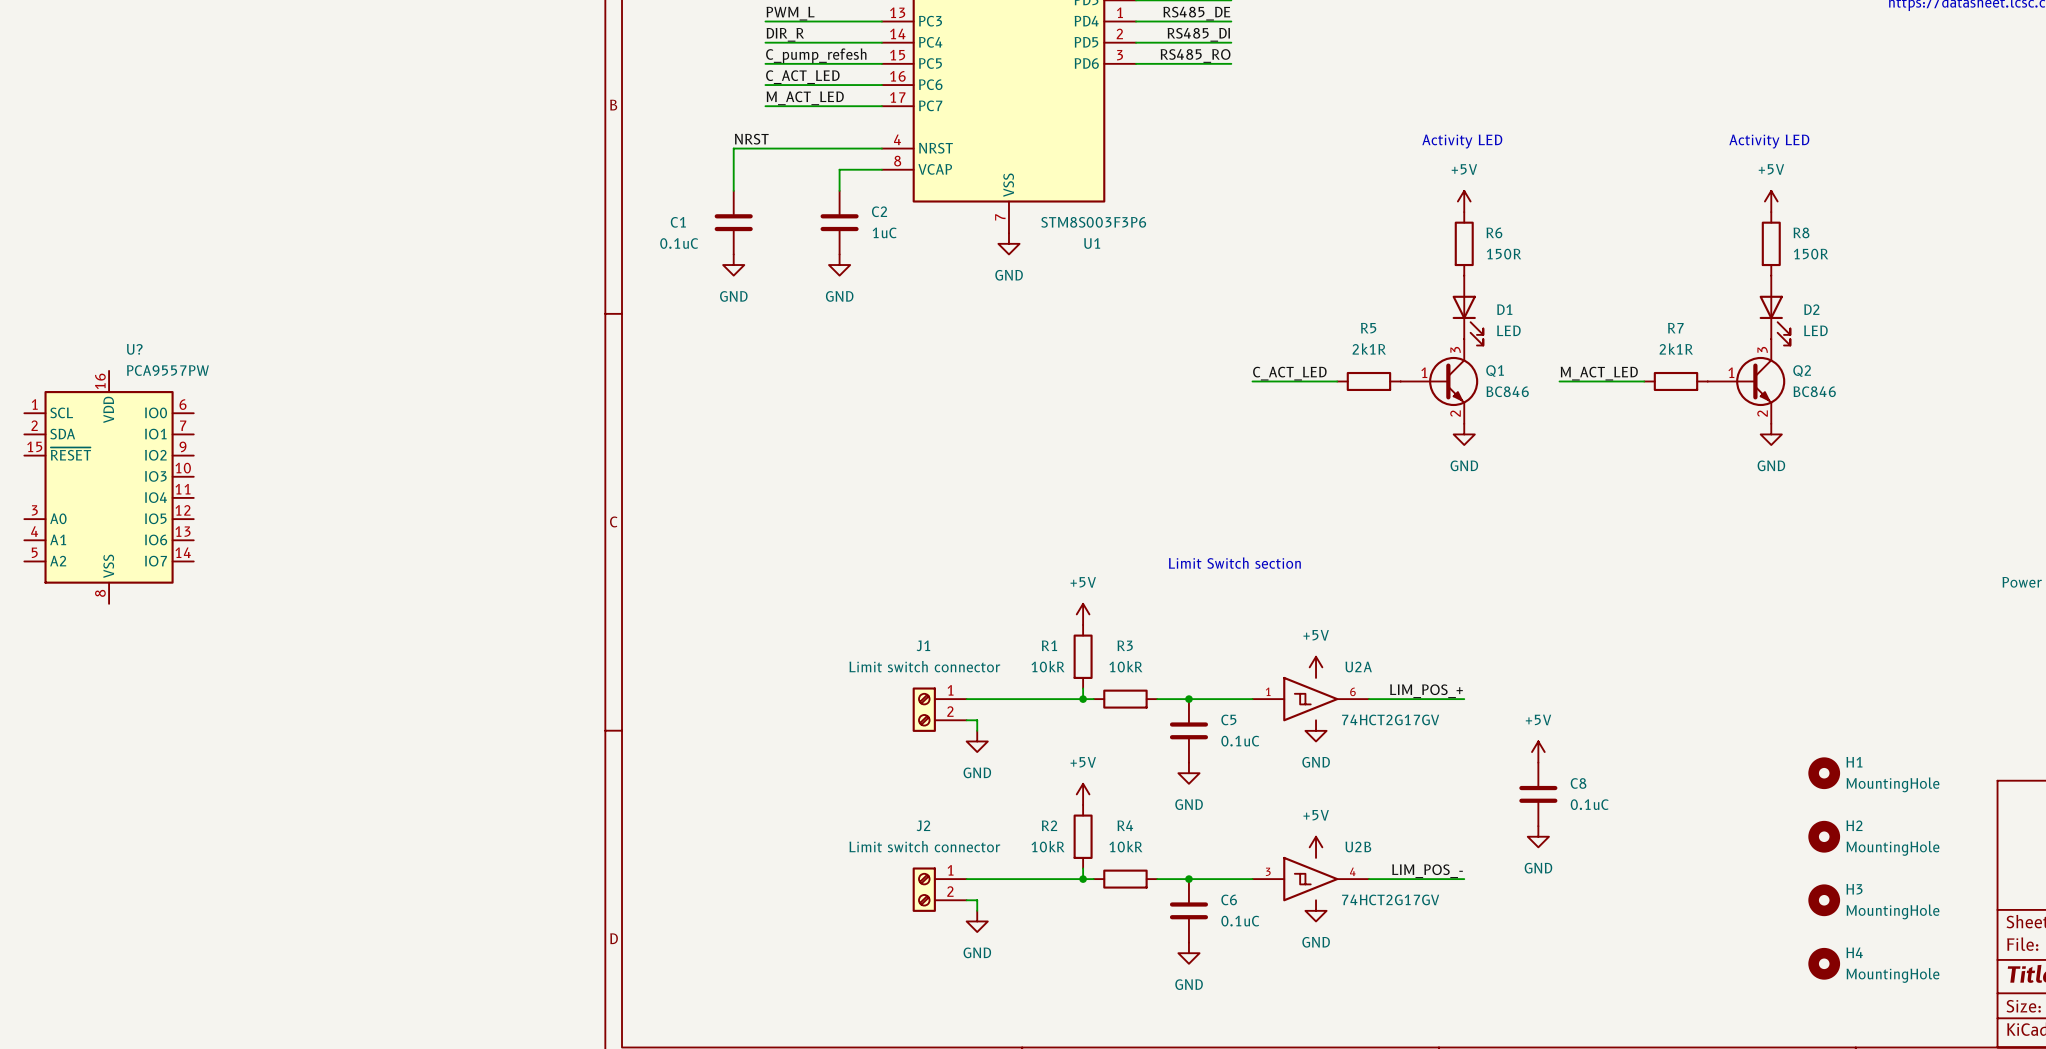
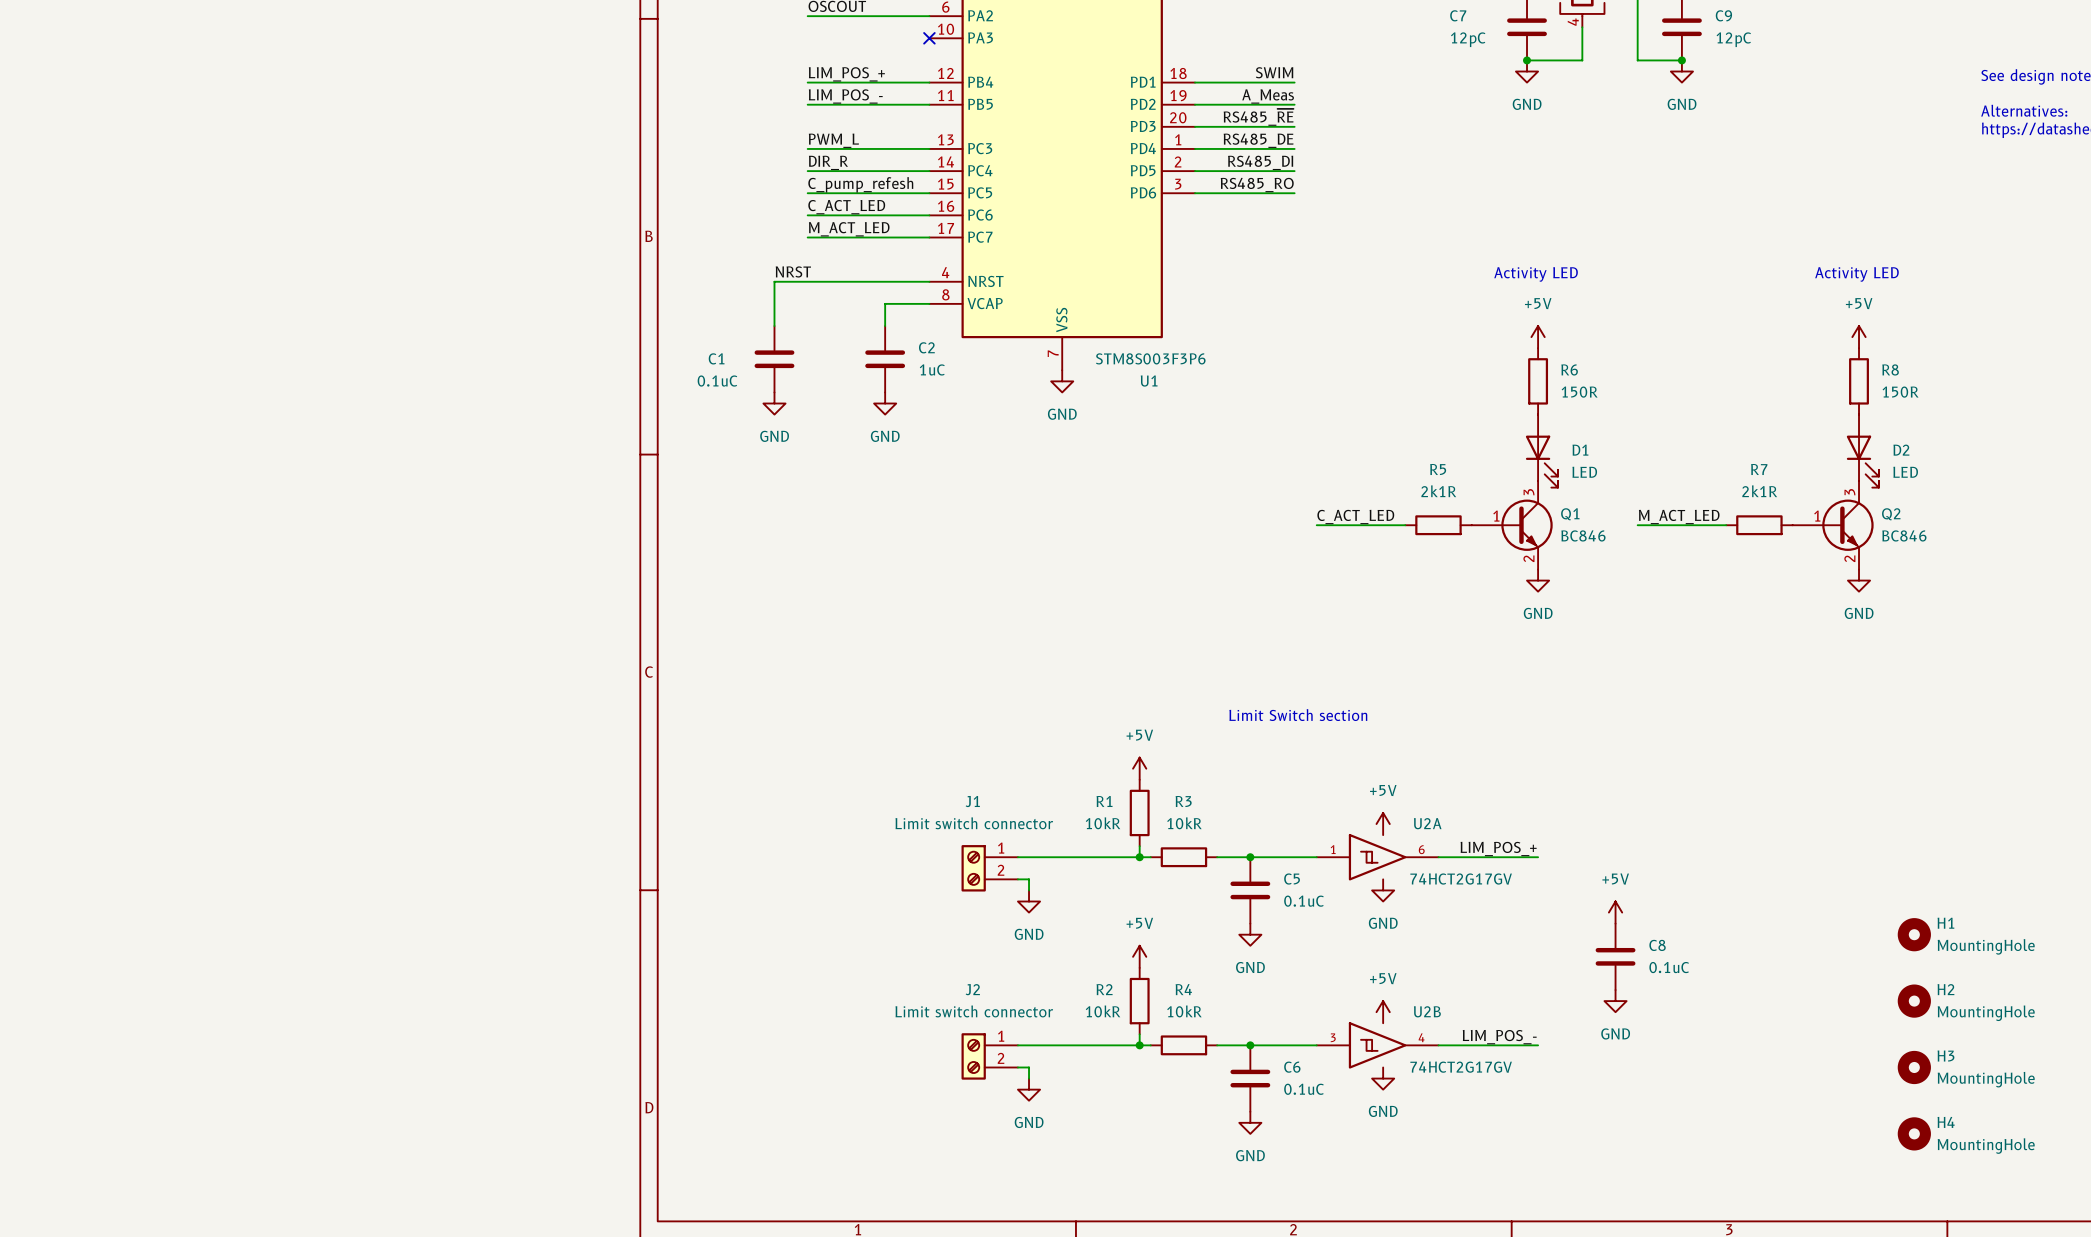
U?: PCA9557PW (109, 487) -> none

